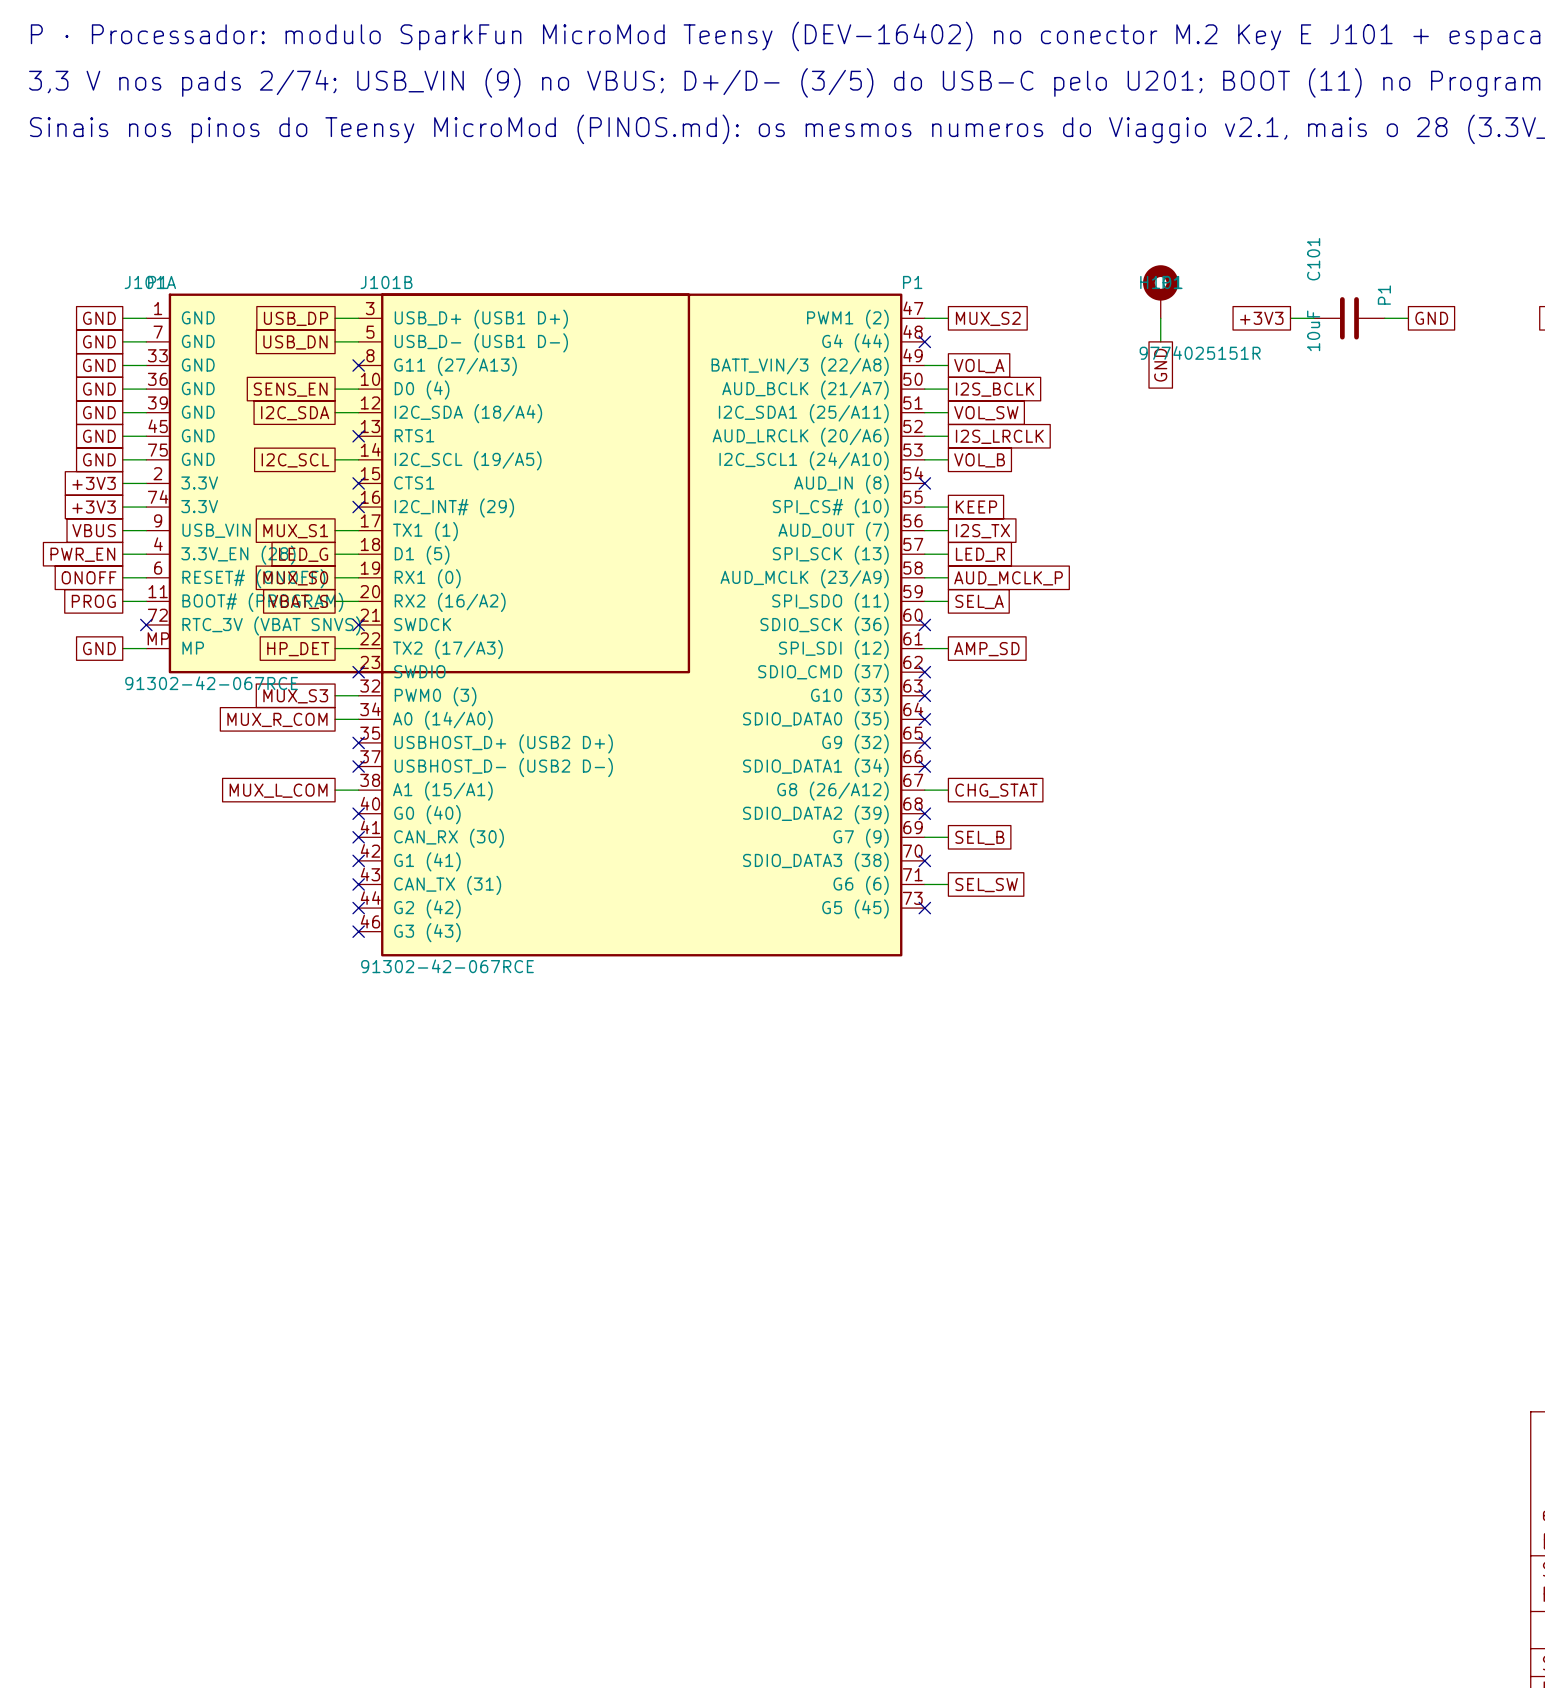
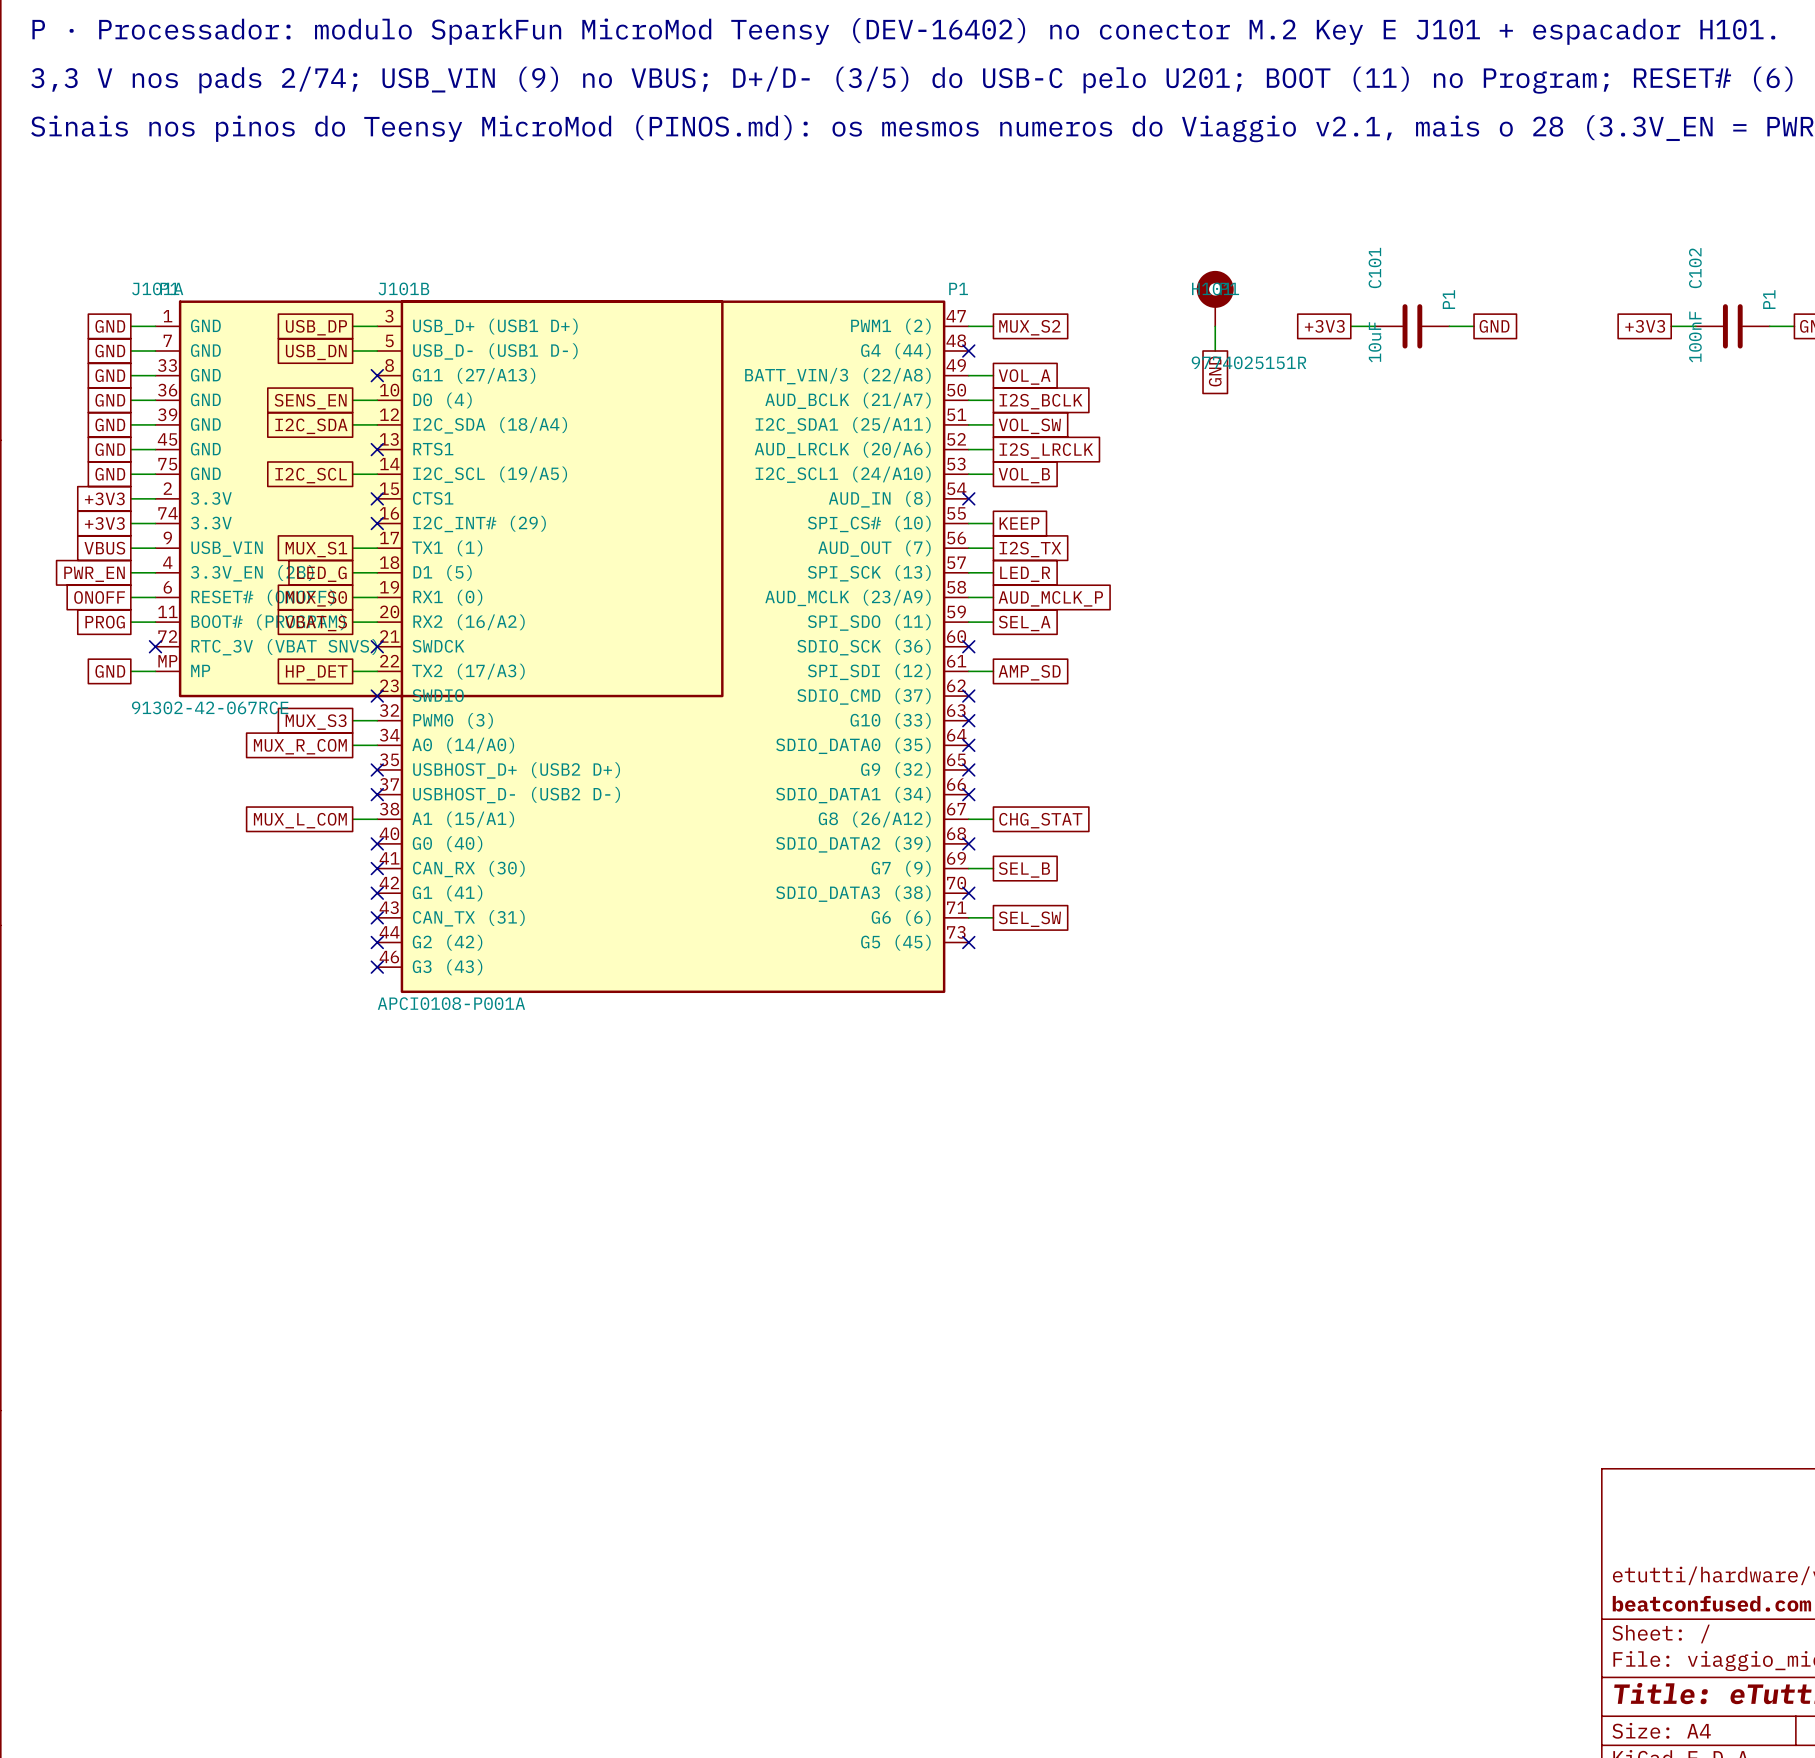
J101B value: 91302-42-067RCE (447, 966) -> APCI0108-P001A (451, 1003)

